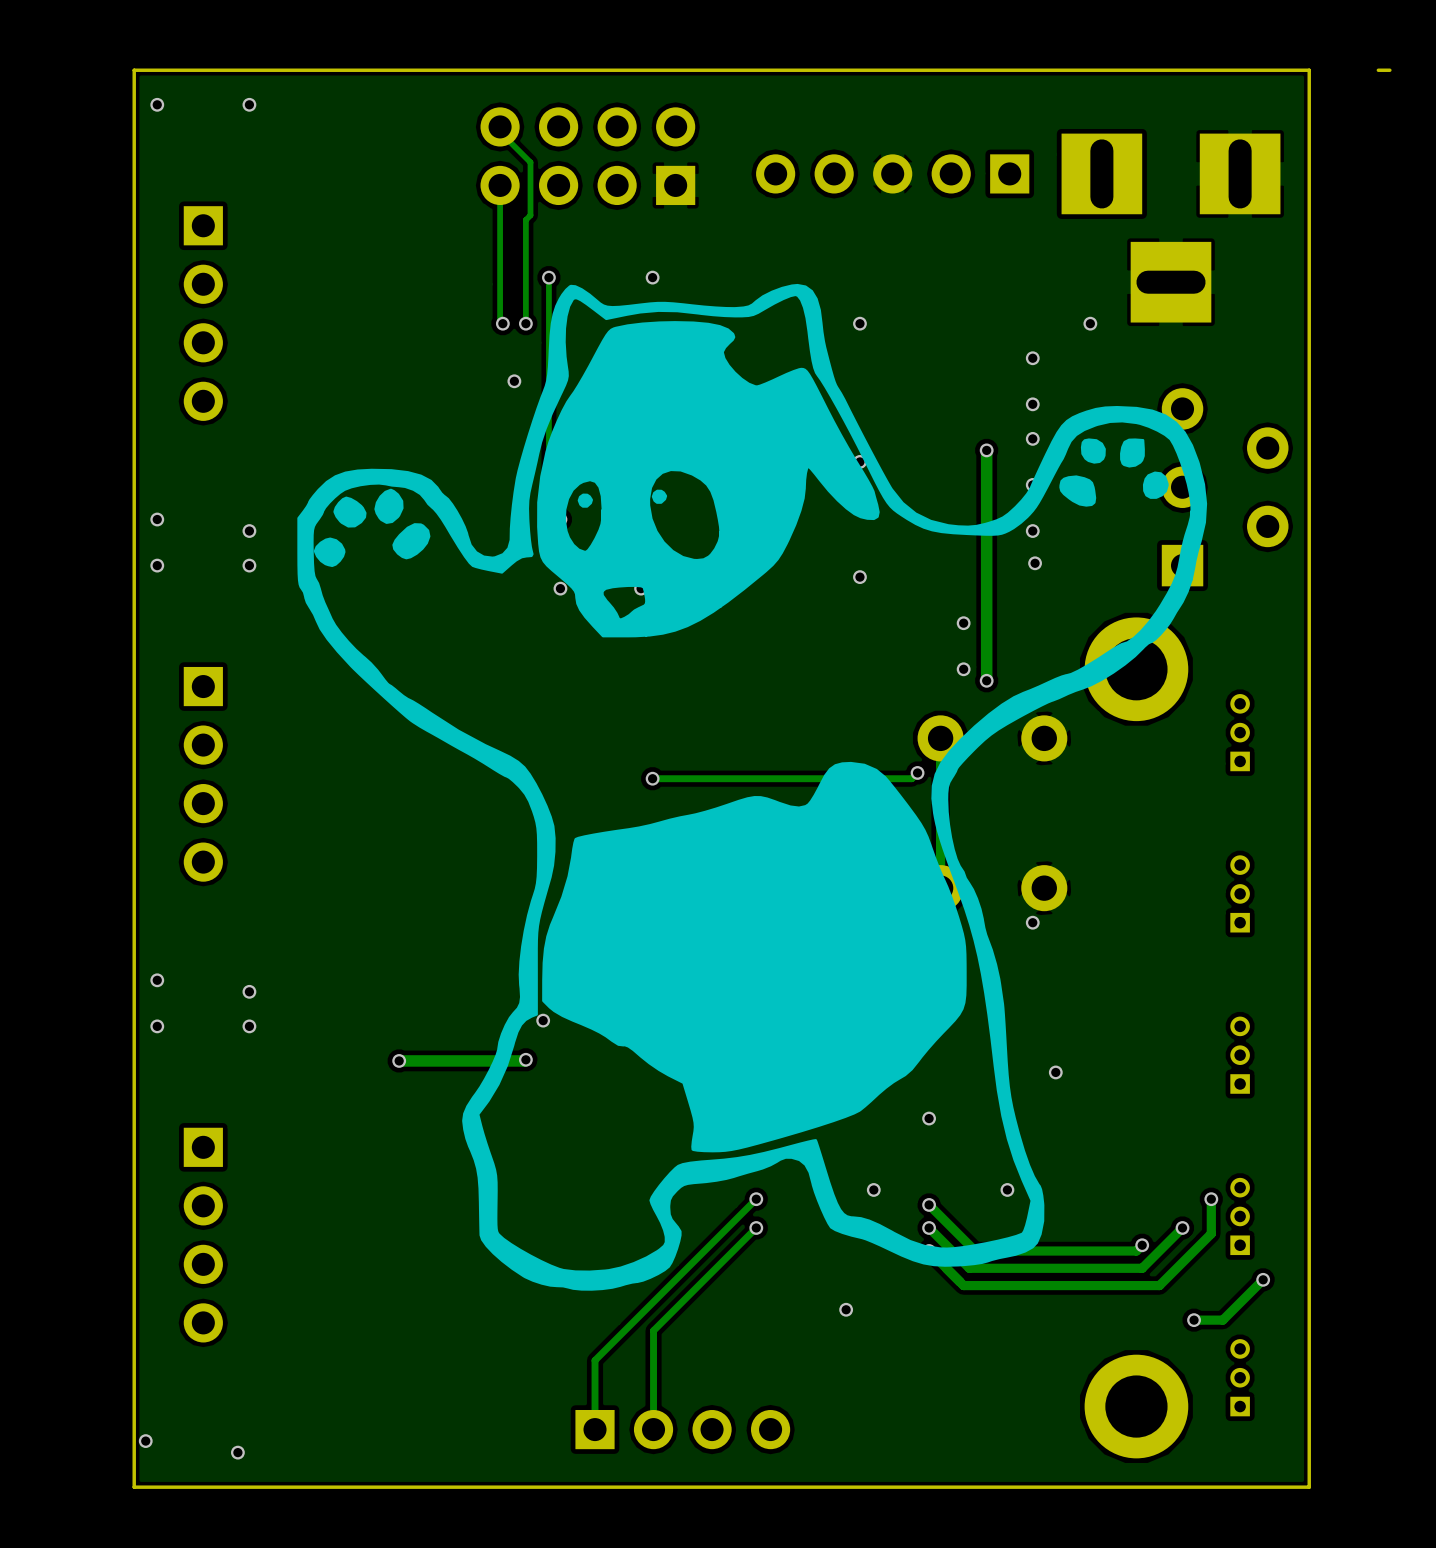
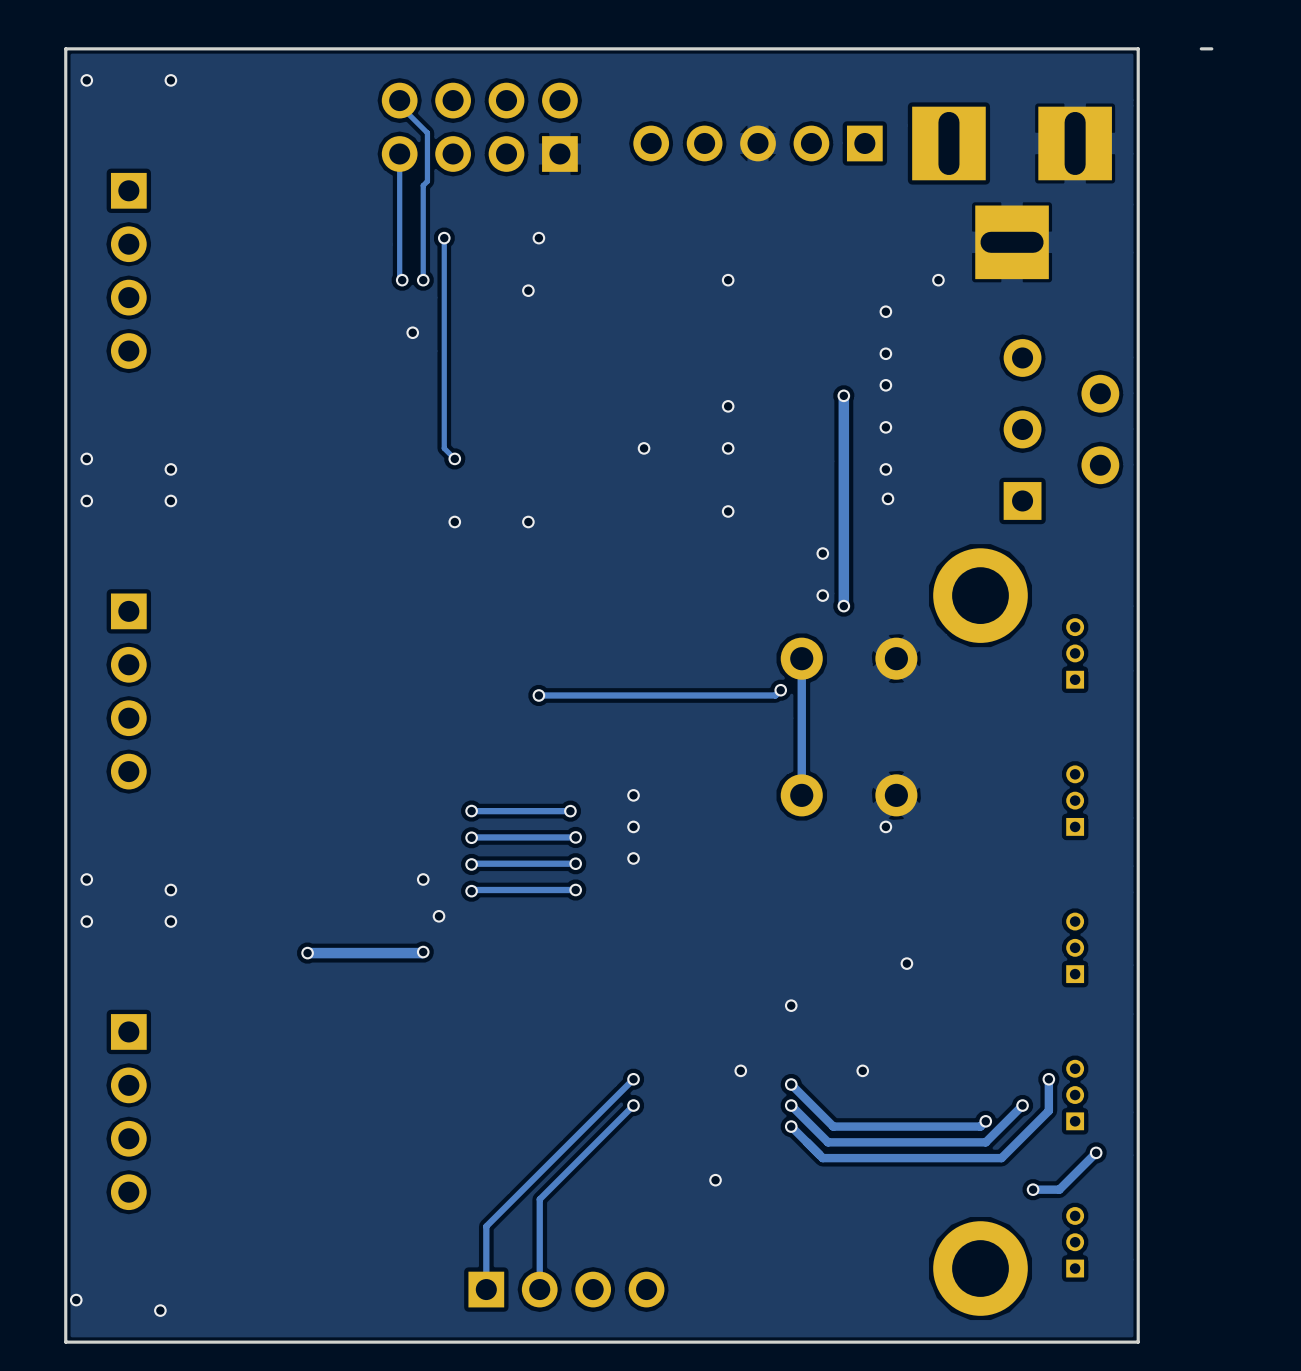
drawing: [297, 283, 1208, 1291] -> none

